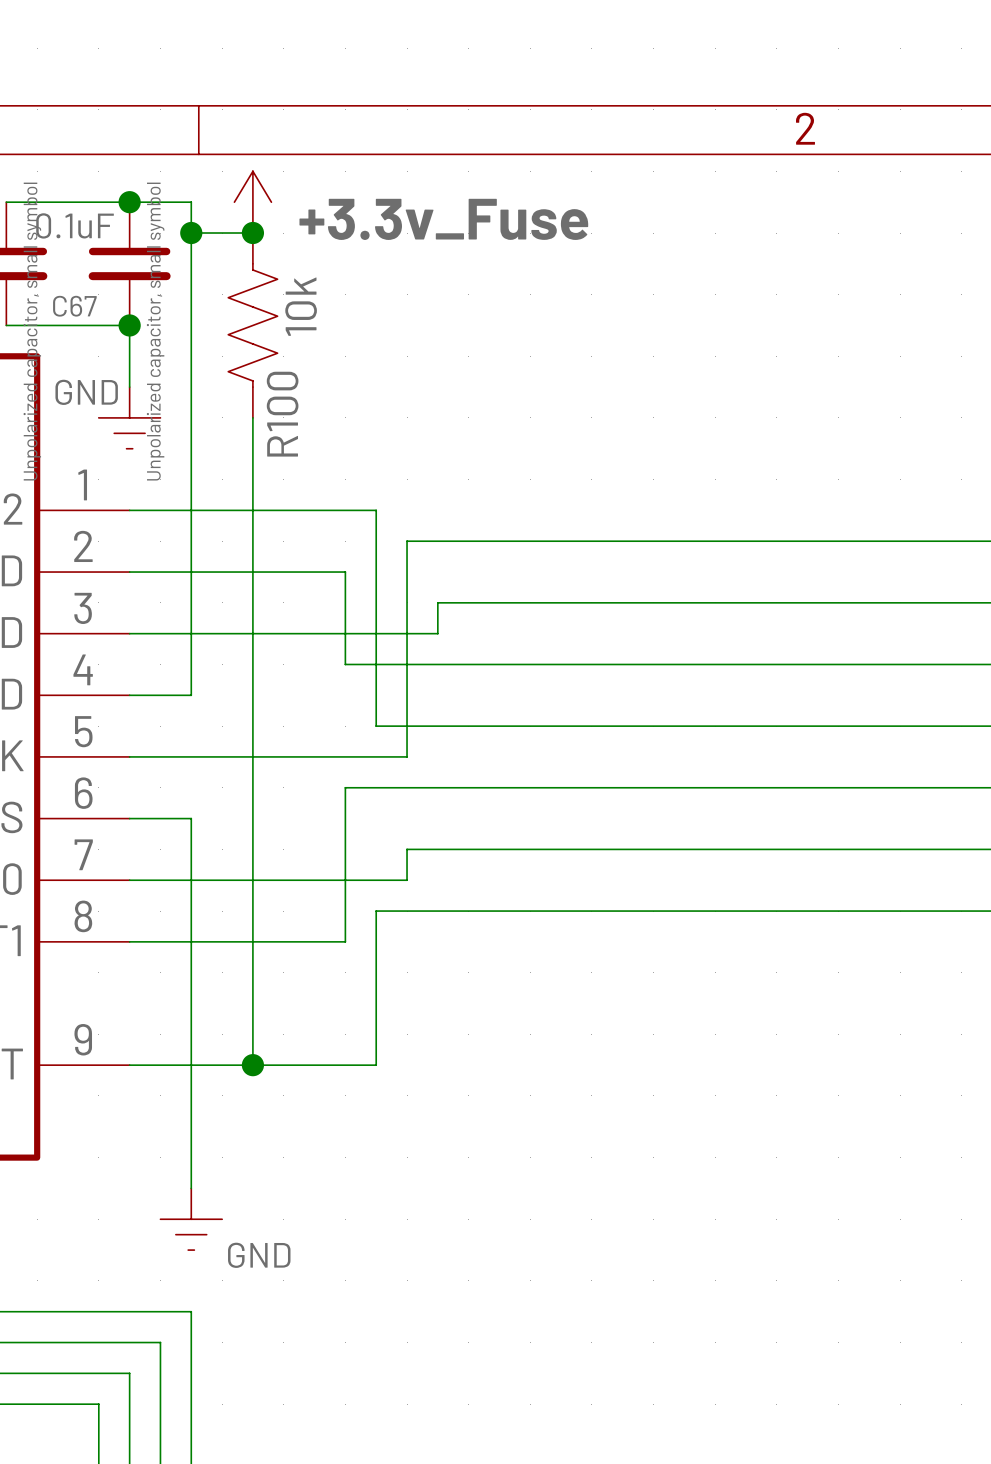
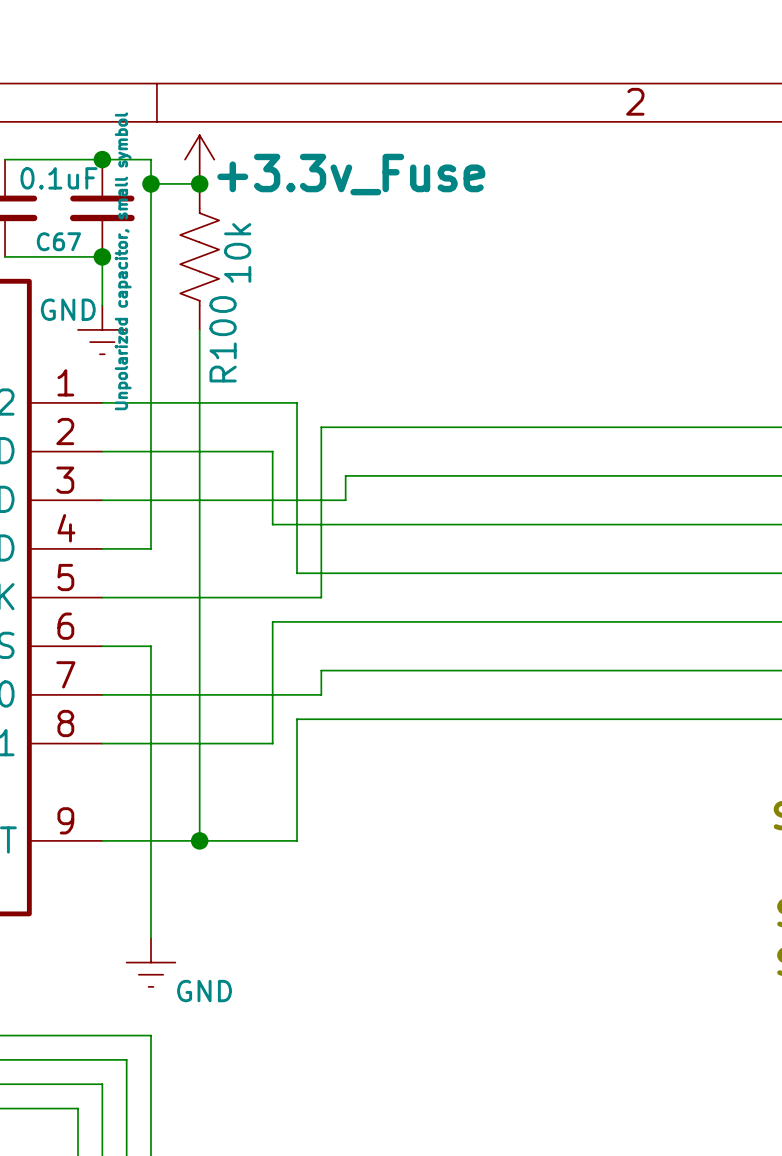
part text: Unpolarized capacitor, small symbol (32, 331) -> none

